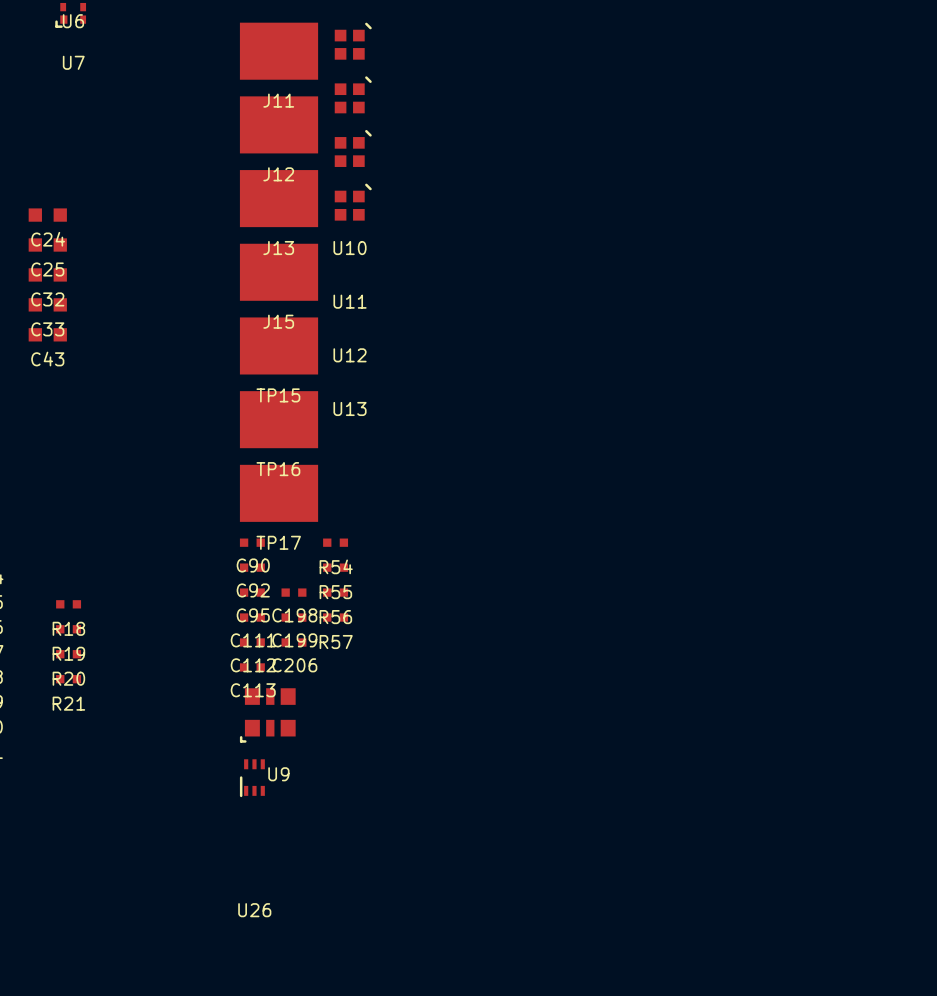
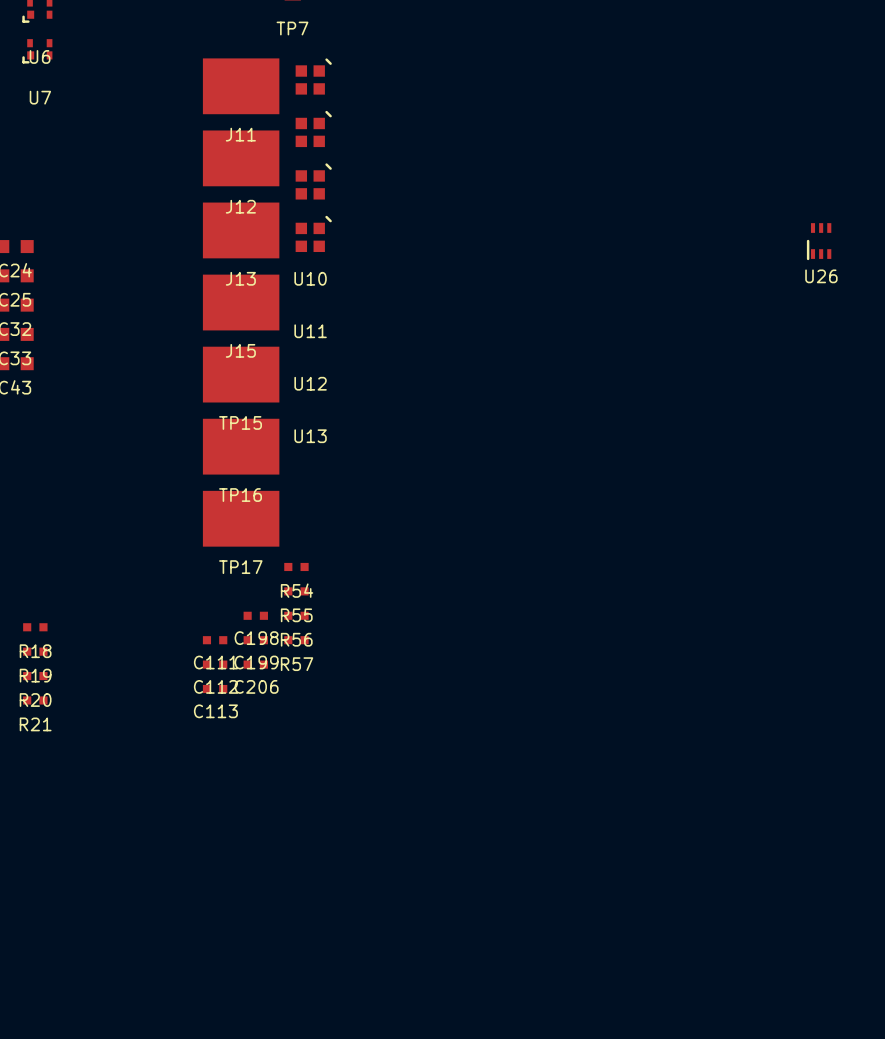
C90: (252, 542) -> none
C92: (252, 567) -> none
C95: (252, 592) -> none
U9: (267, 715) -> none
U26 position: (252, 778) -> (819, 241)
U26 name position: U26 (254, 910) -> U26 (821, 276)

